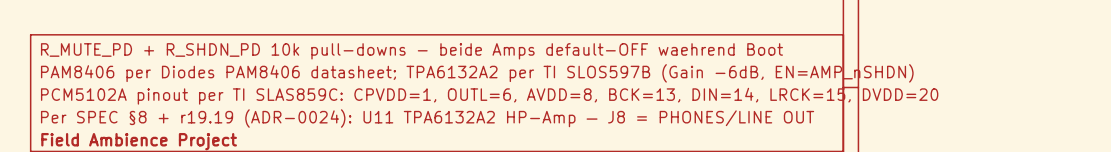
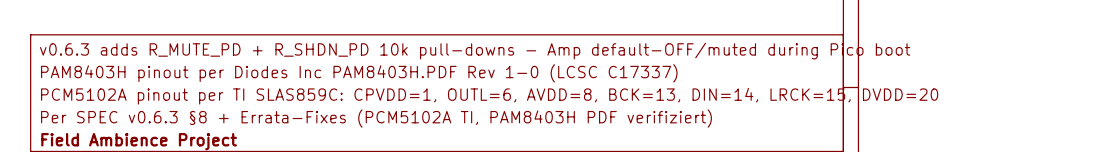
title block: R_MUTE_PD + R_SHDN_PD 10k pull-downs - beide Amps default-OFF waehrend Boot (411, 51) -> v0.6.3 adds R_MUTE_PD + R_SHDN_PD 10k pull-downs - Amp default-OFF/muted during Pico boot (475, 51)
title block: PAM8406 per Diodes PAM8406 datasheet; TPA6132A2 per TI SLOS597B (Gain -6dB, EN=AMP_nSHDN) (477, 73) -> PAM8403H pinout per Diodes Inc PAM8403H.PDF Rev 1-0 (LCSC C17337) (359, 73)
title block: Per SPEC §8 + r19.19 (ADR-0024): U11 TPA6132A2 HP-Amp — J8 = PHONES/LINE OUT (427, 118) -> Per SPEC v0.6.3 §8 + Errata-Fixes (PCM5102A TI, PAM8403H PDF verifiziert) (376, 118)

